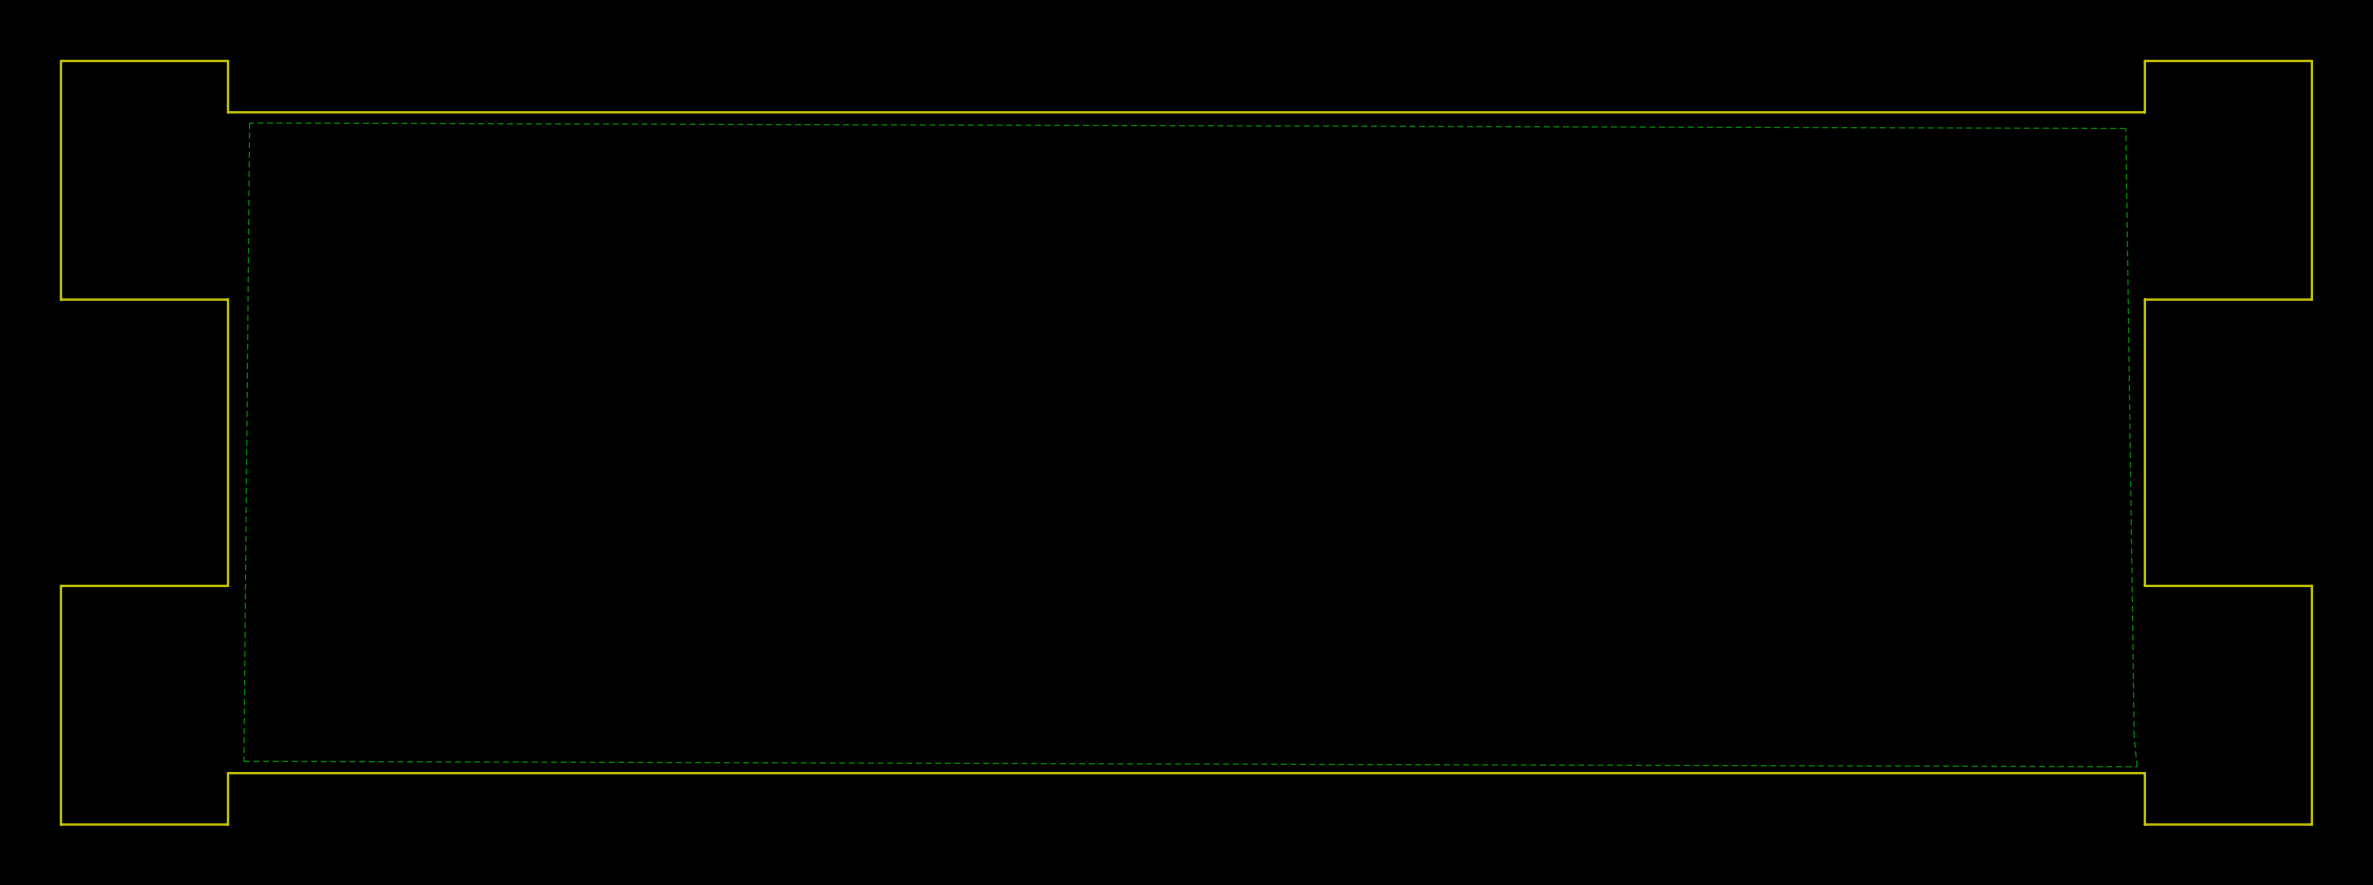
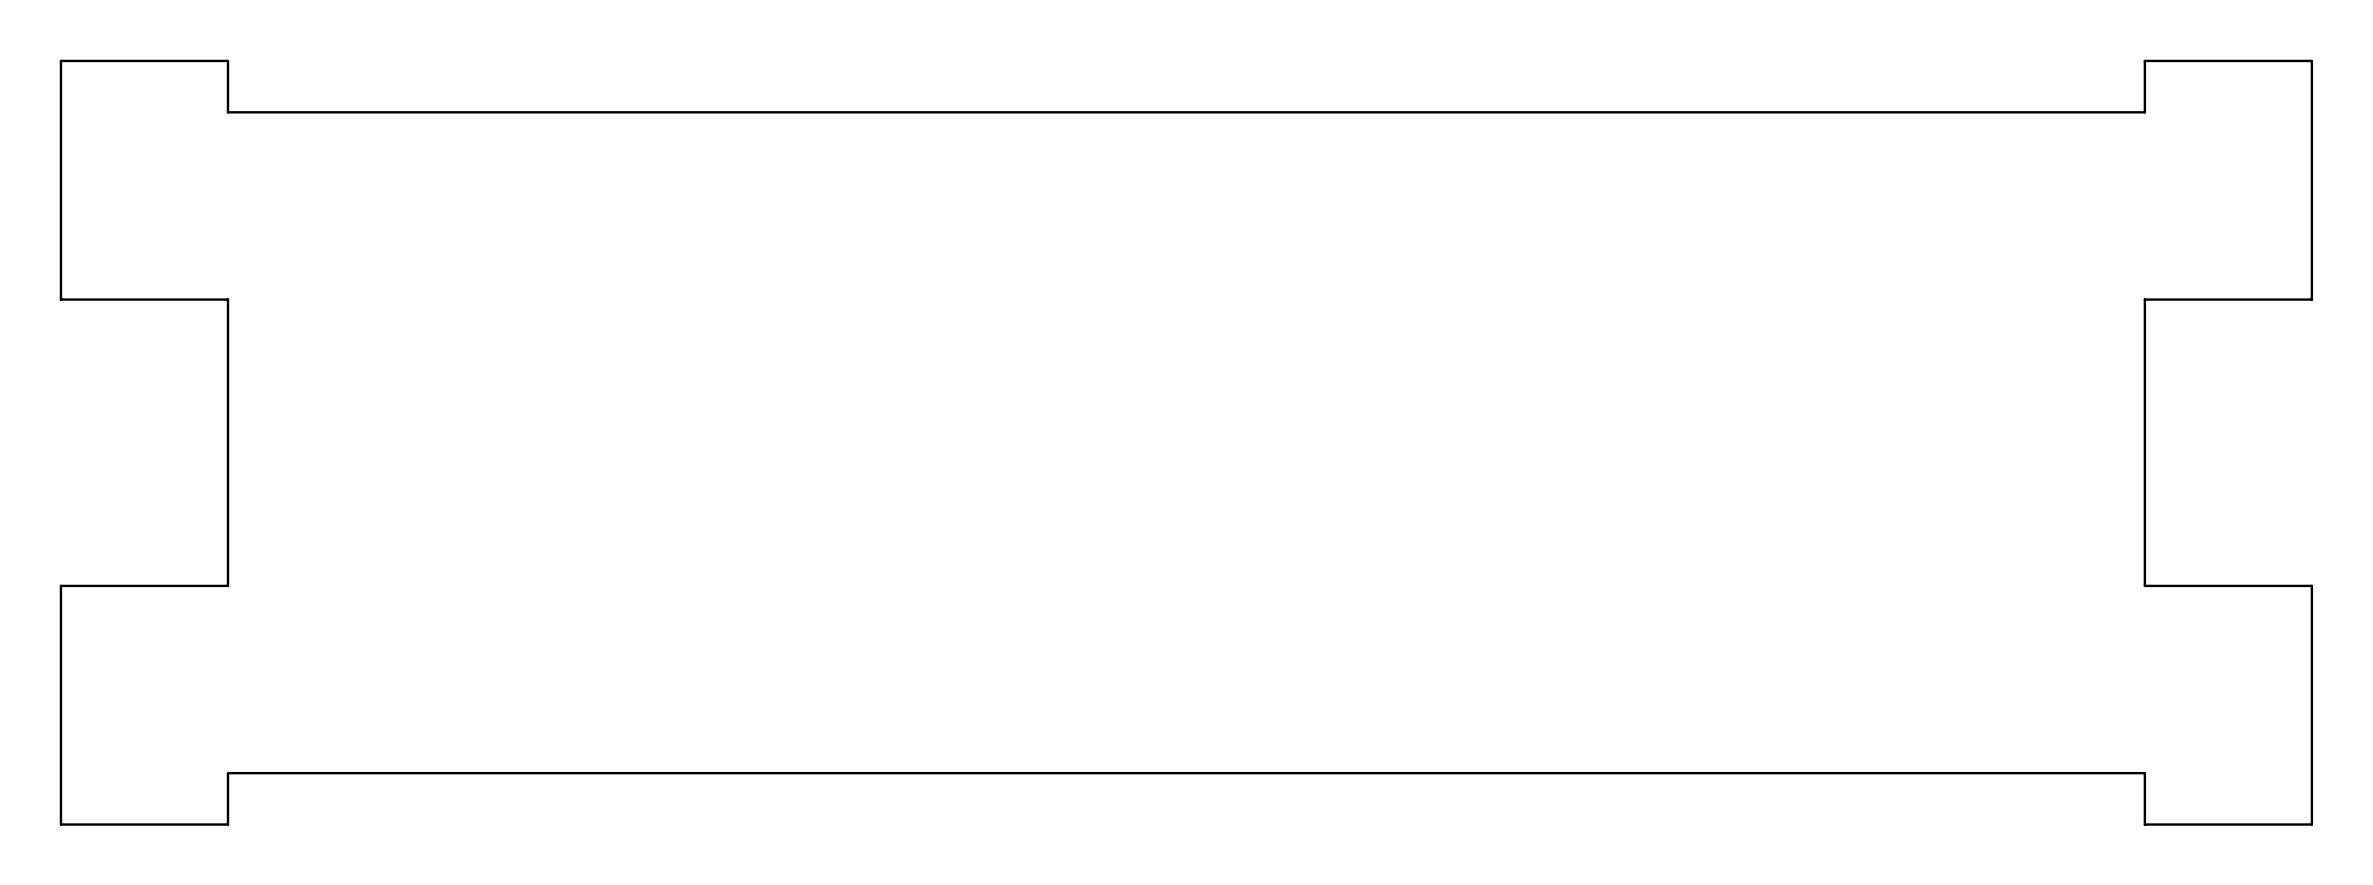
zone outline: (249, 122) (2125, 128) (2134, 736) (2137, 766) (243, 761) (249, 122) -> none

